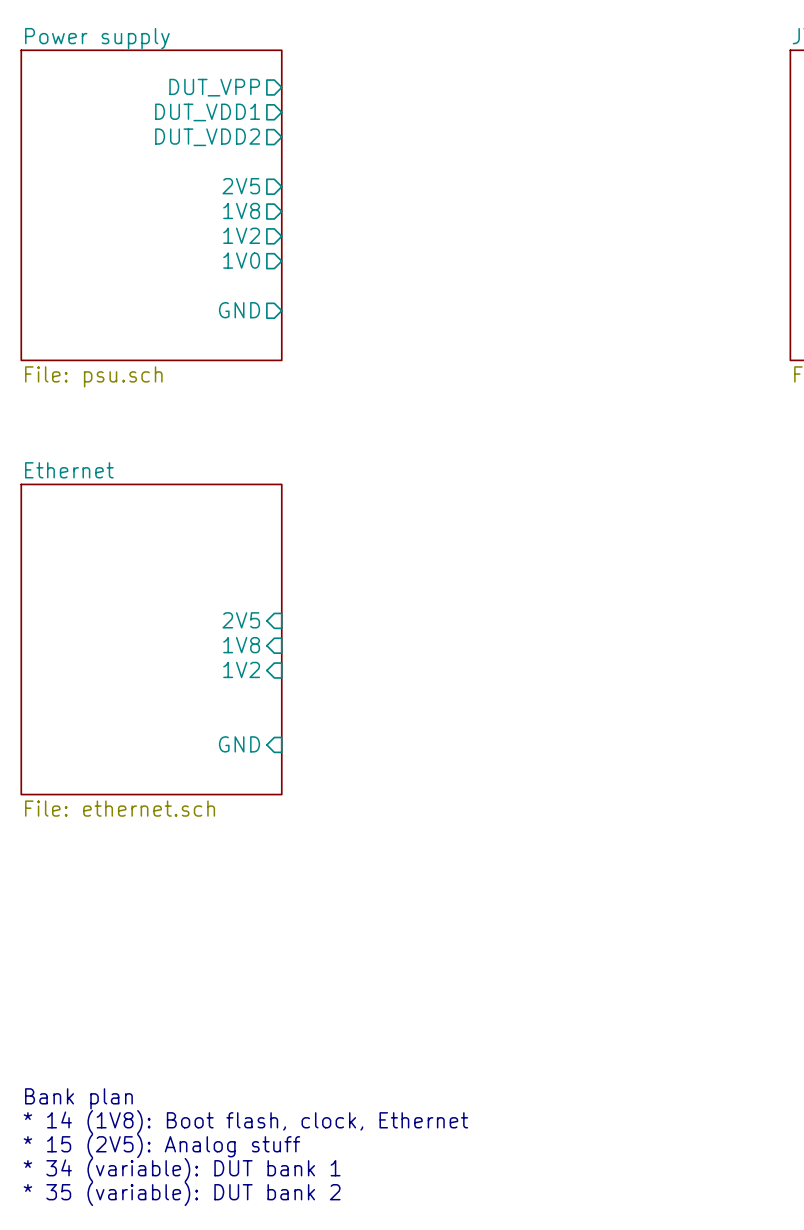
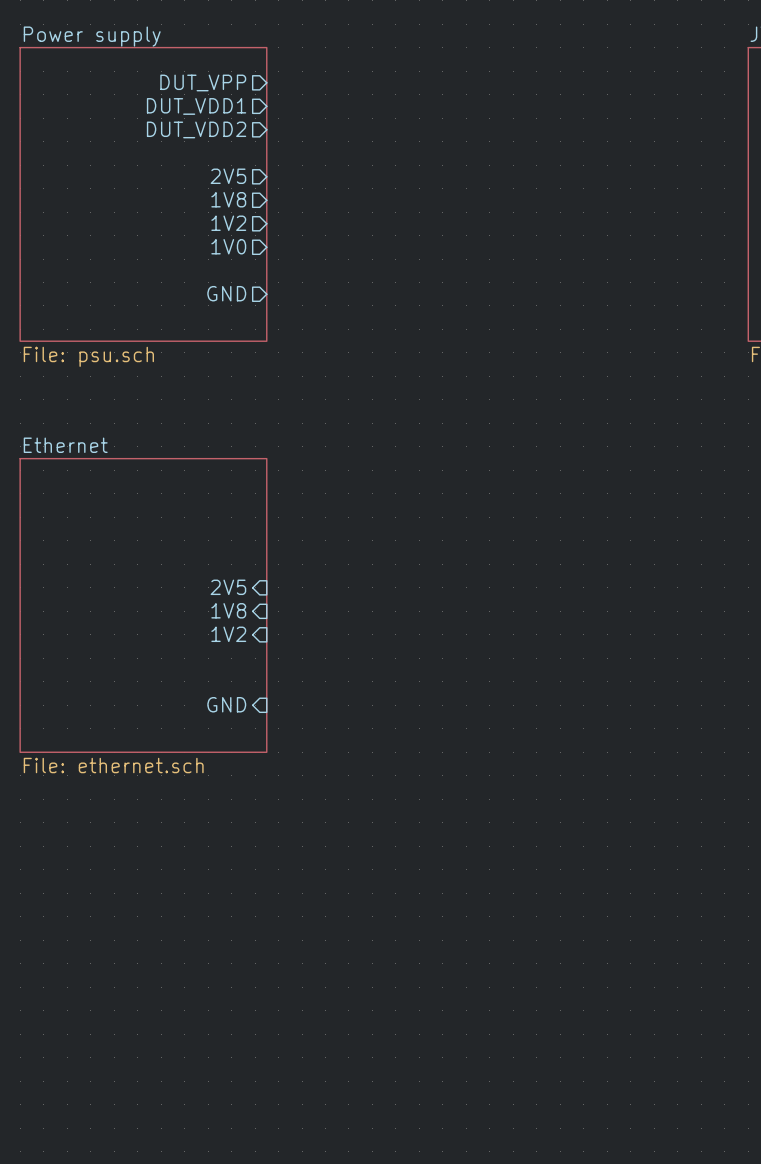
text: Bank plan (78, 1098) -> none
text: * 14 (1V8): Boot flash, clock, Ethernet (245, 1122) -> none
text: * 15 (2V5): Analog stuff (161, 1146) -> none
text: * 34 (variable): DUT bank 1 (182, 1170) -> none
text: * 35 (variable): DUT bank 2 (182, 1193) -> none

